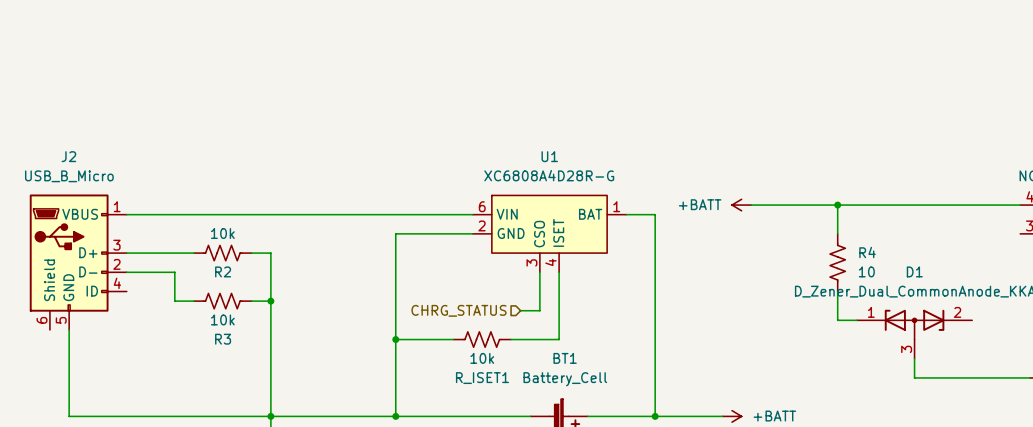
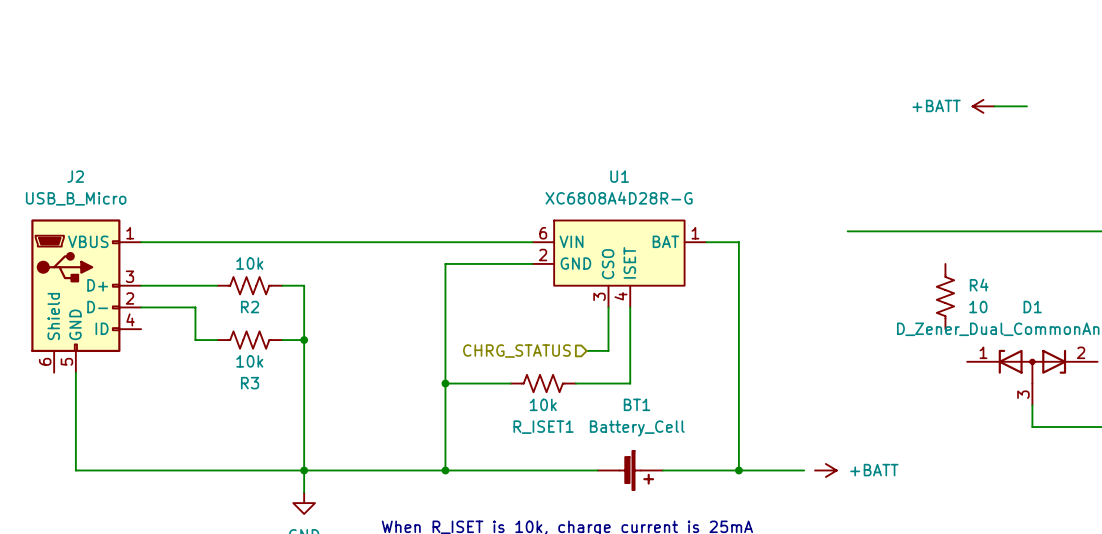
wire: none -> (994, 106) (1026, 106)
power symbol position: +BATT (741, 205) -> +BATT (983, 106)
wire: (837, 205) (837, 233) -> none
junction: (837, 205) -> none
wire: (837, 291) (837, 320) (856, 320) -> none
wire: (712, 416) (722, 416) -> none

